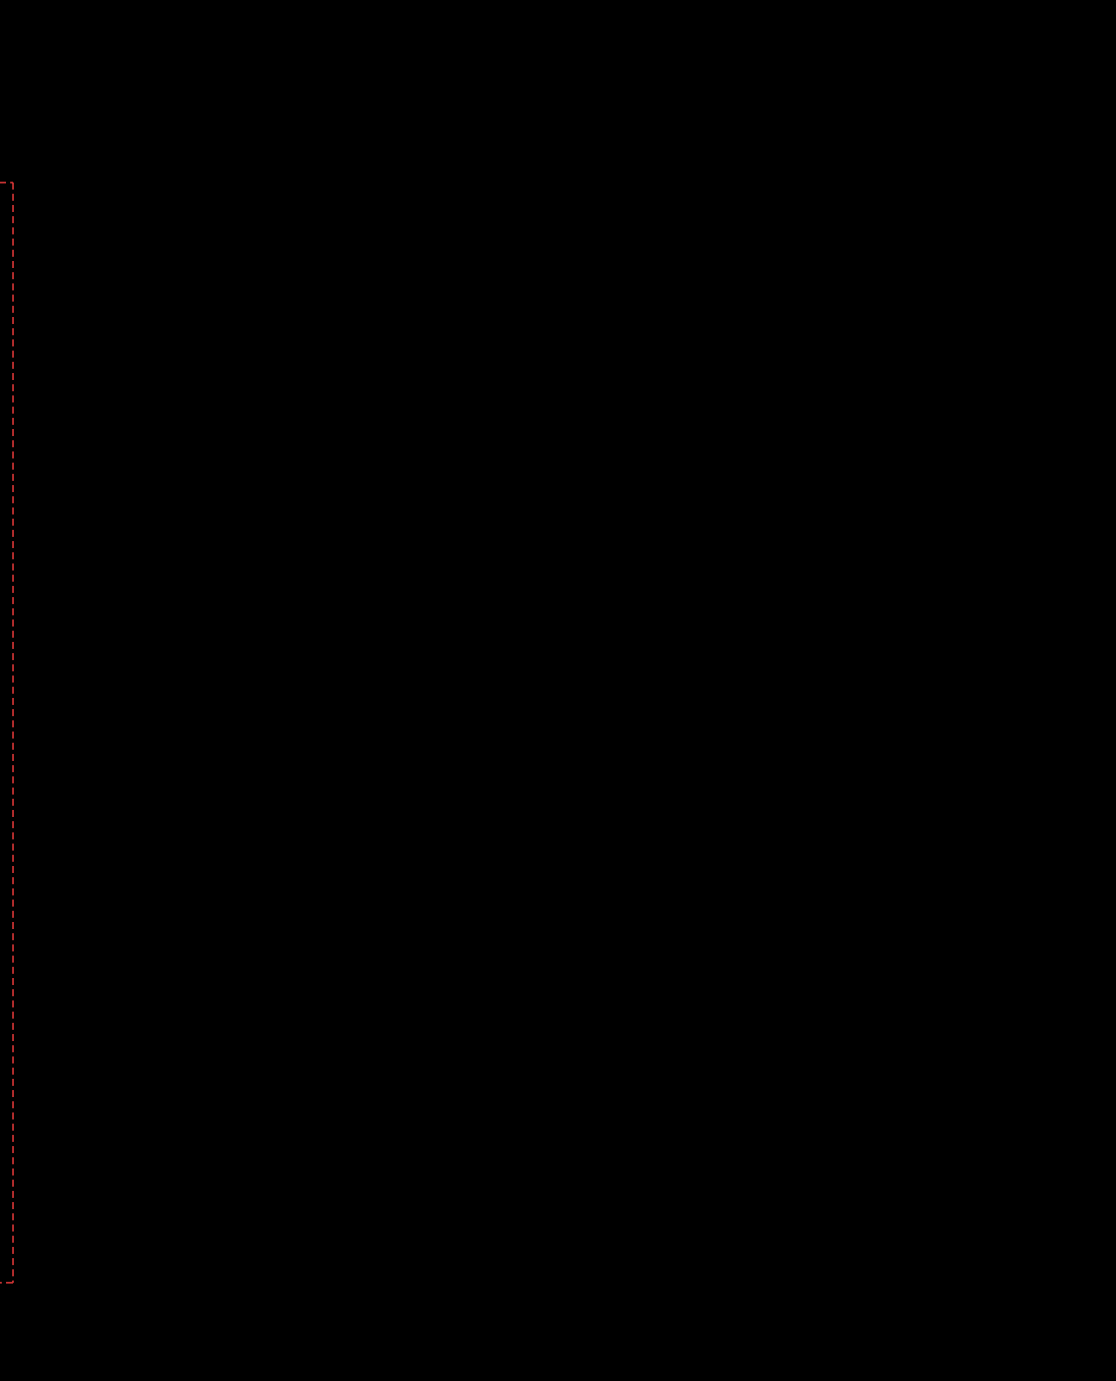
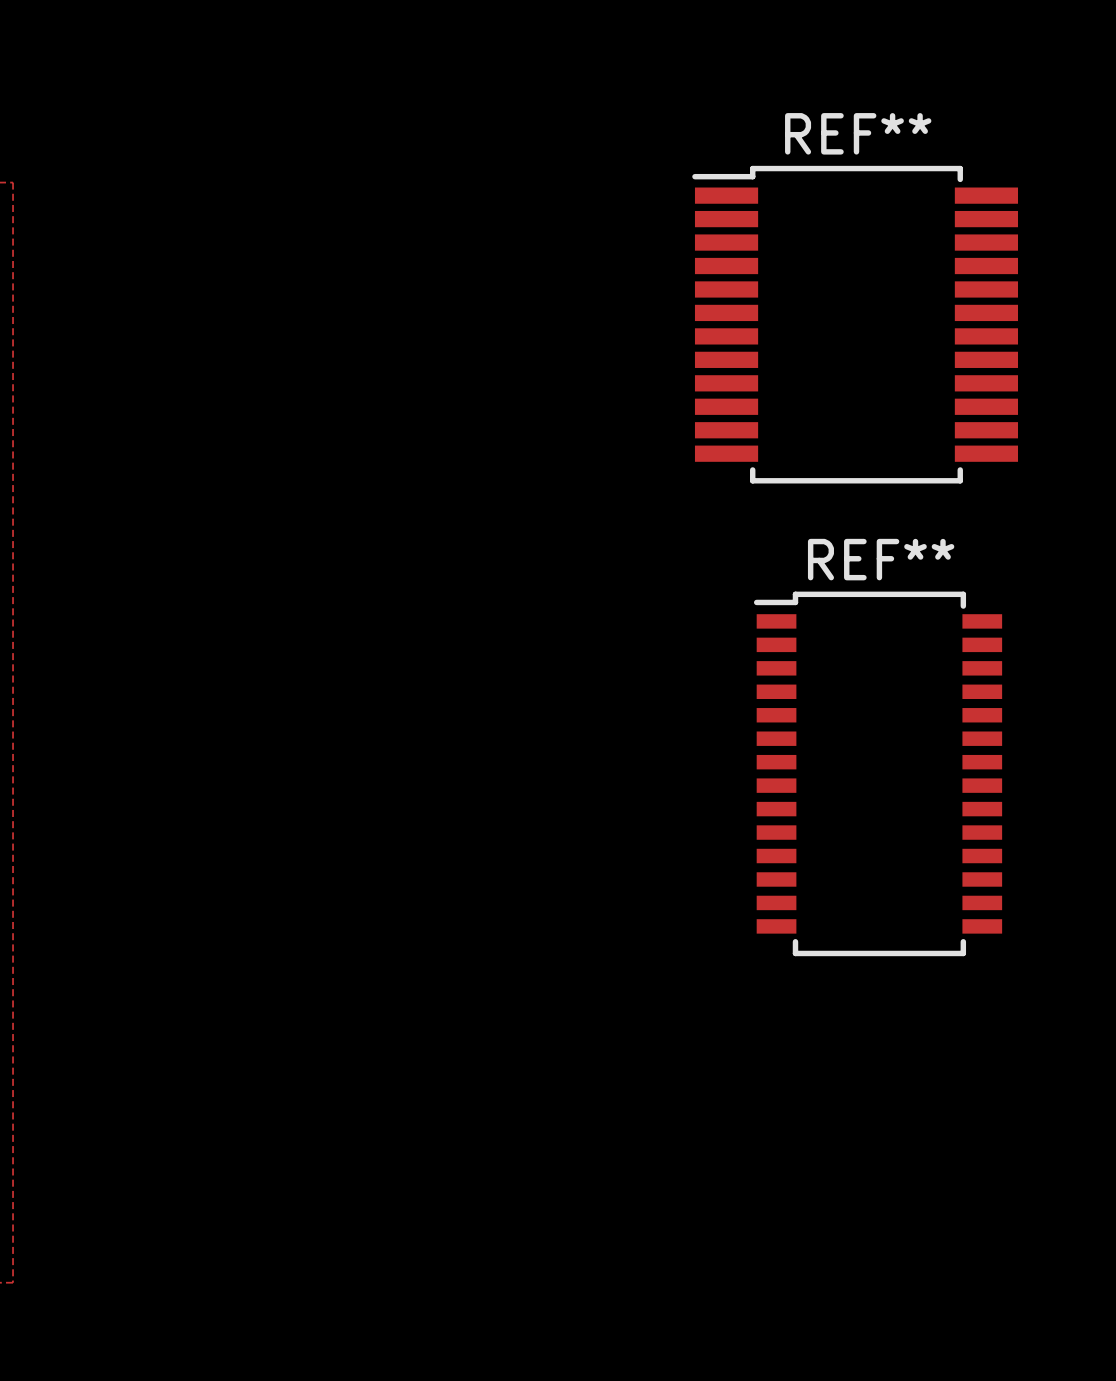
REF**: none -> (855, 324)
REF**: none -> (878, 773)

